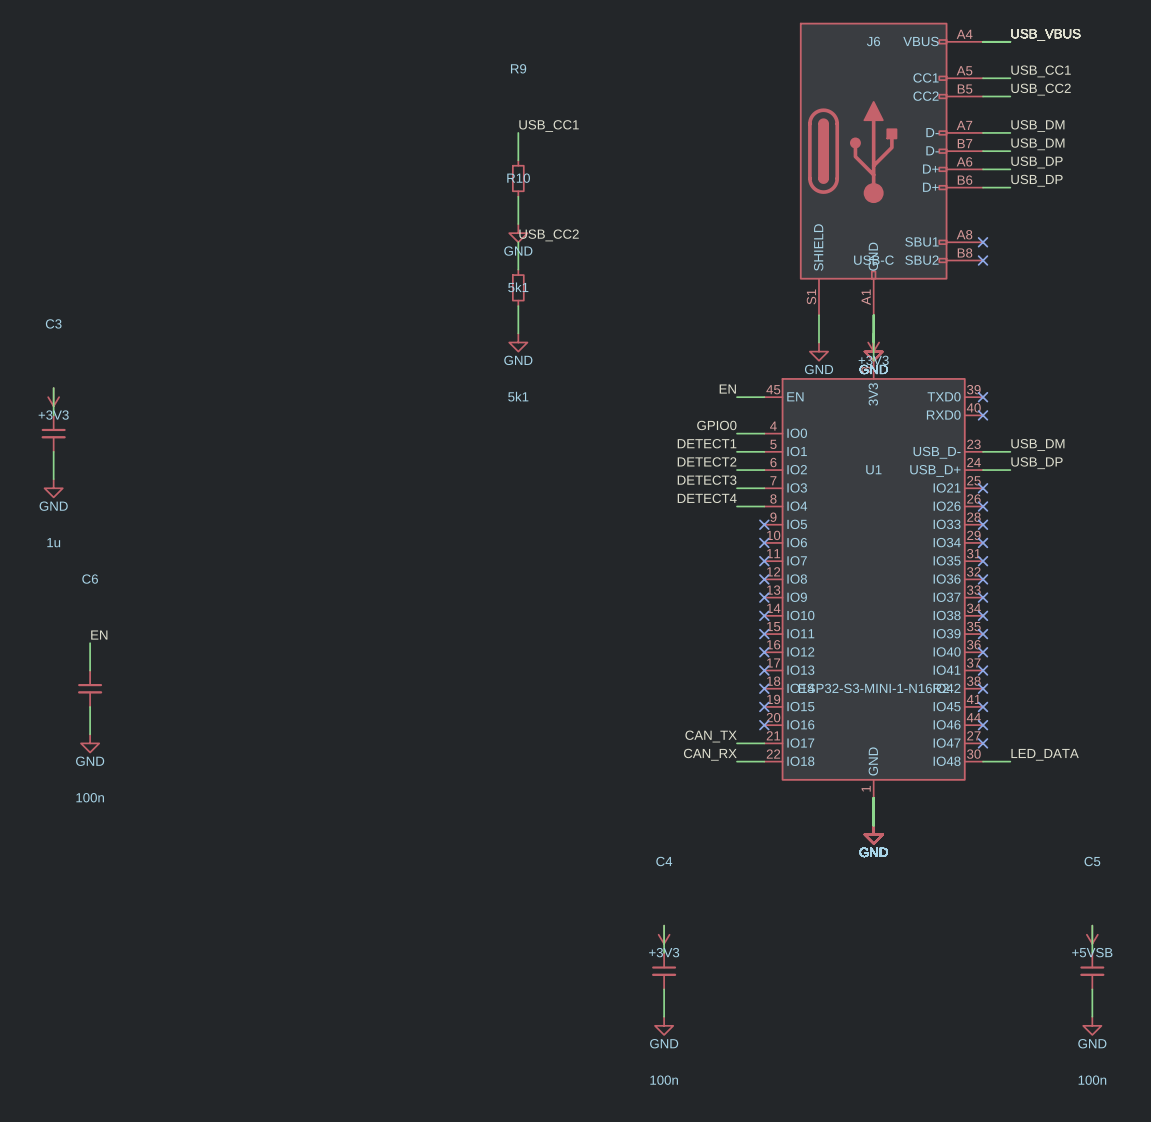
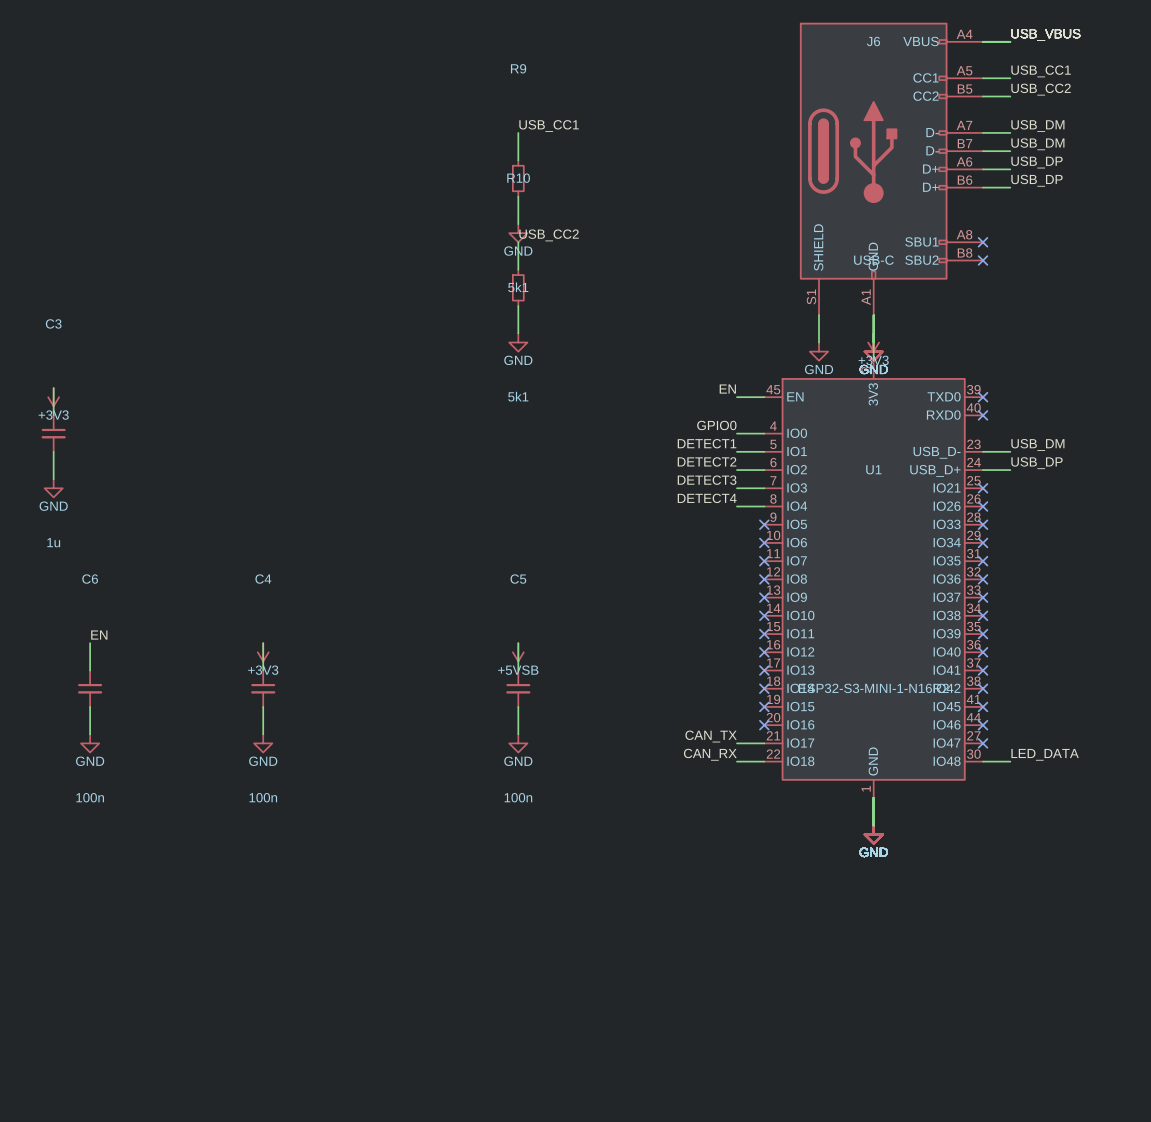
wire: none -> (263, 643) (263, 670)
wire: none -> (518, 643) (518, 670)
power symbol: none -> +3V3 (263, 652)
power symbol: none -> +5VSB (518, 652)
wire: none -> (263, 706) (263, 734)
wire: none -> (518, 706) (518, 734)
power symbol: none -> GND (263, 743)
power symbol: none -> GND (518, 743)
wire: (664, 925) (664, 952) -> none
wire: (1092, 925) (1092, 952) -> none
power symbol: +3V3 (664, 934) -> none
power symbol: +5VSB (1092, 934) -> none
C4 position: (664, 971) -> (263, 688)
C5 position: (1092, 971) -> (518, 688)
wire: (664, 989) (664, 1016) -> none
wire: (1092, 989) (1092, 1016) -> none
power symbol: GND (664, 1025) -> none
power symbol: GND (1092, 1025) -> none

